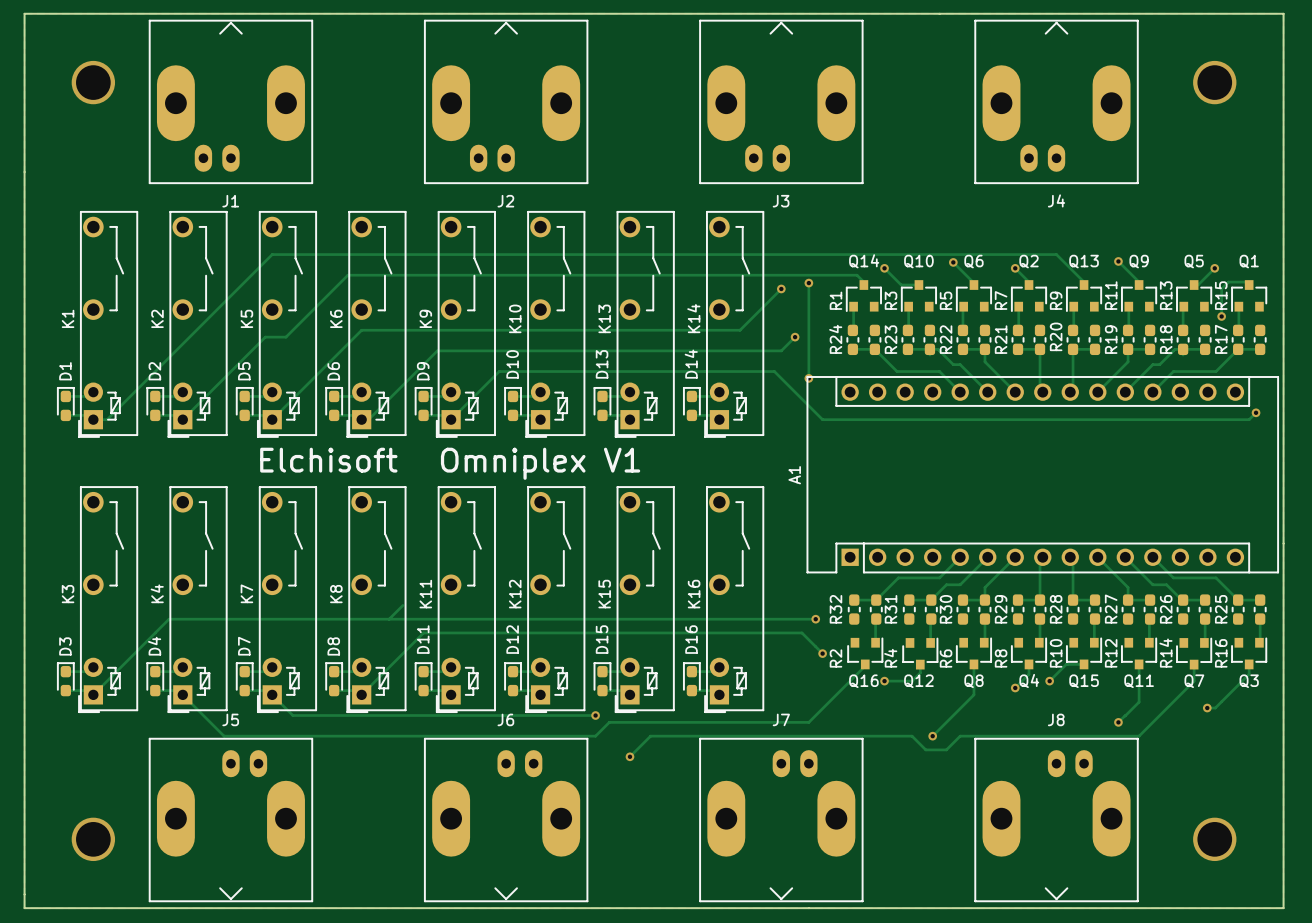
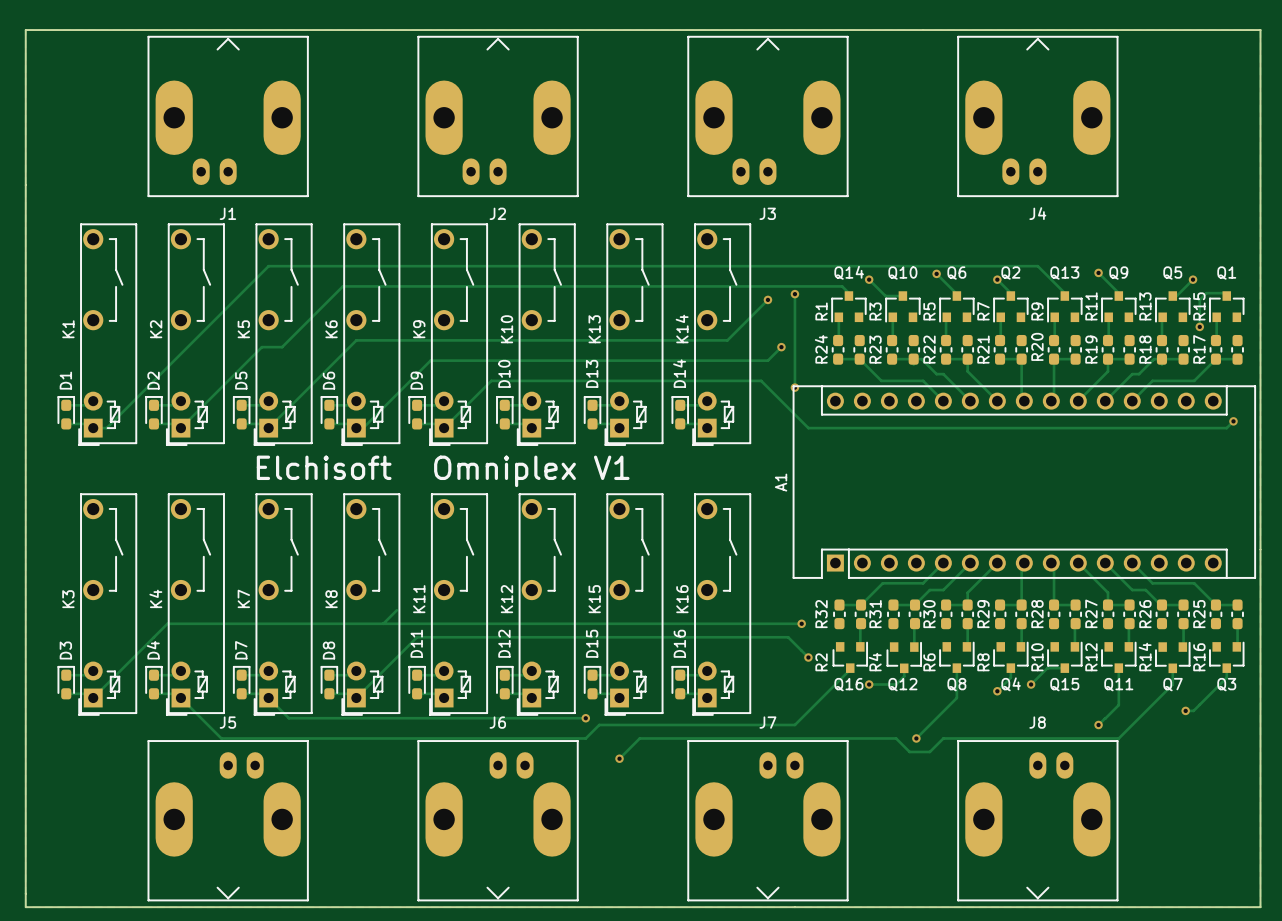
via: (93, 82) -> none
via: (1214, 82) -> none
via: (93, 839) -> none
via: (1214, 839) -> none

